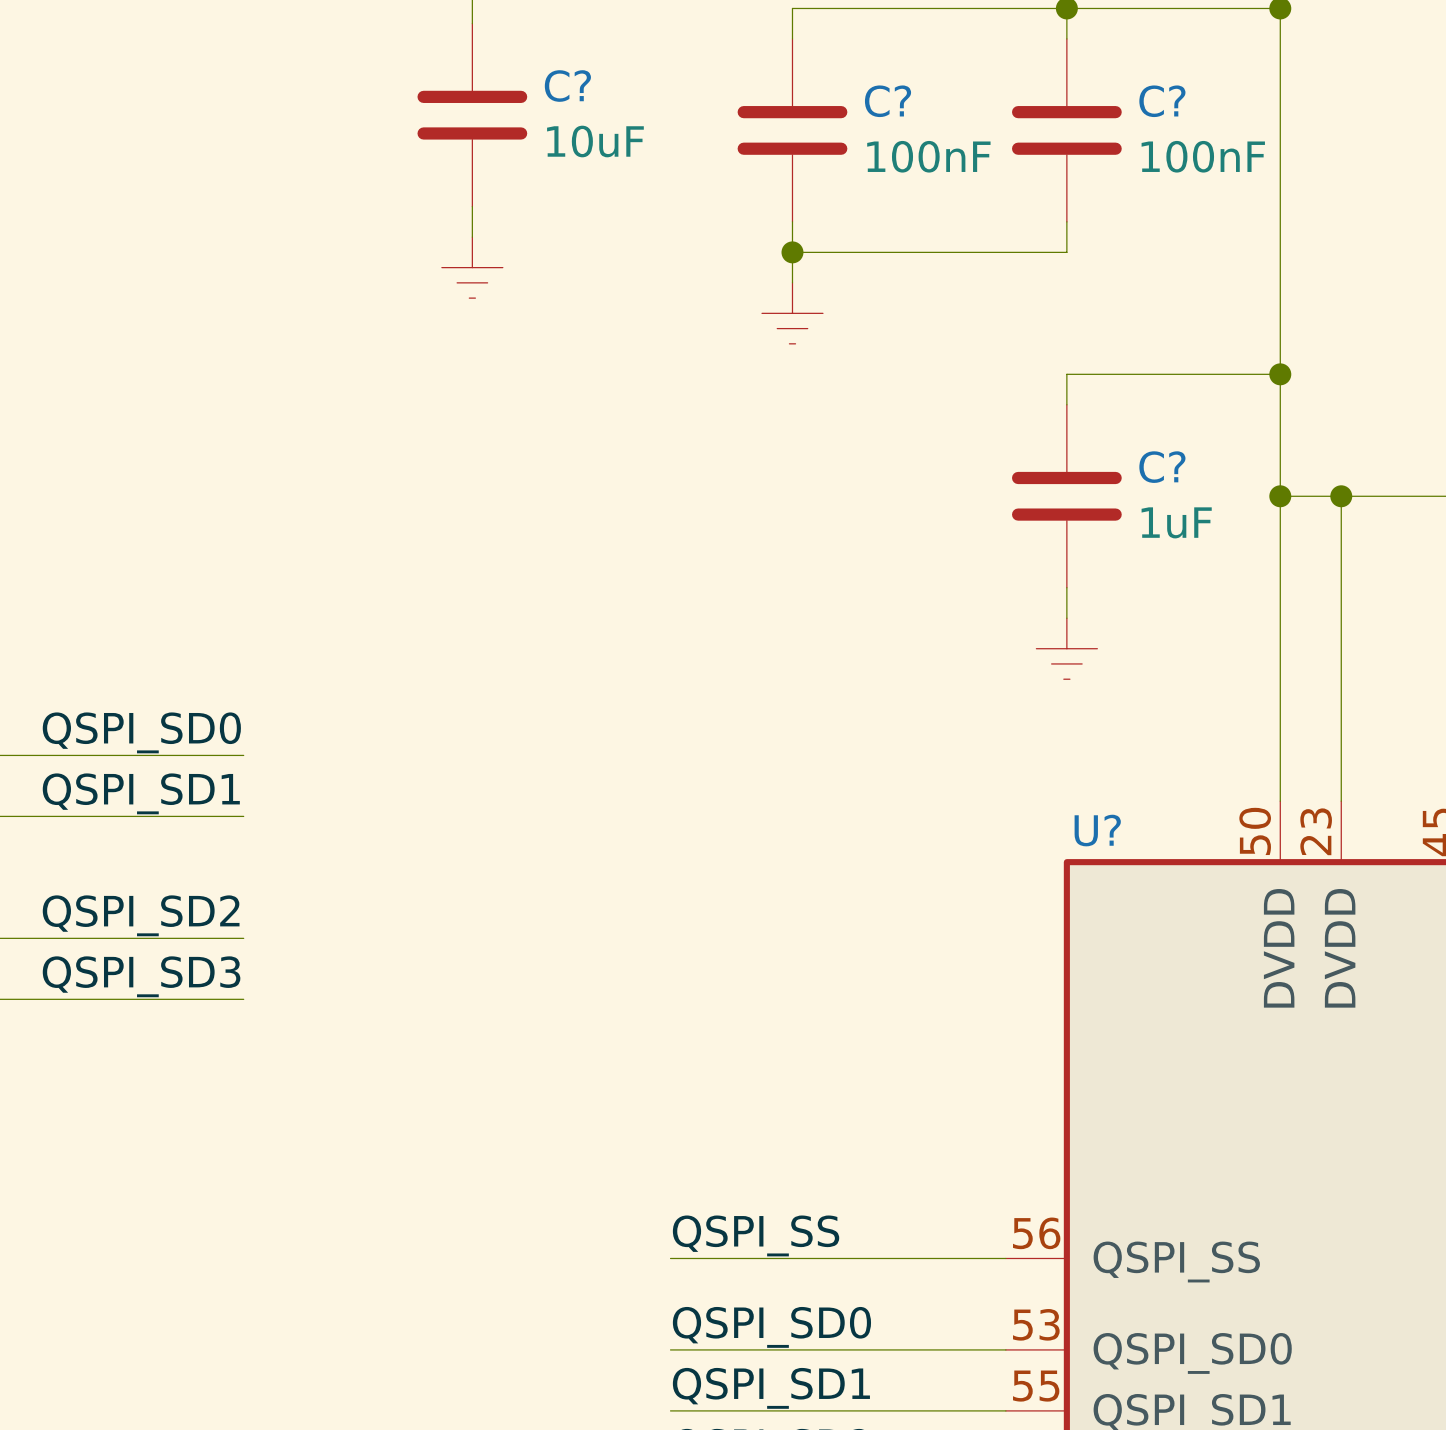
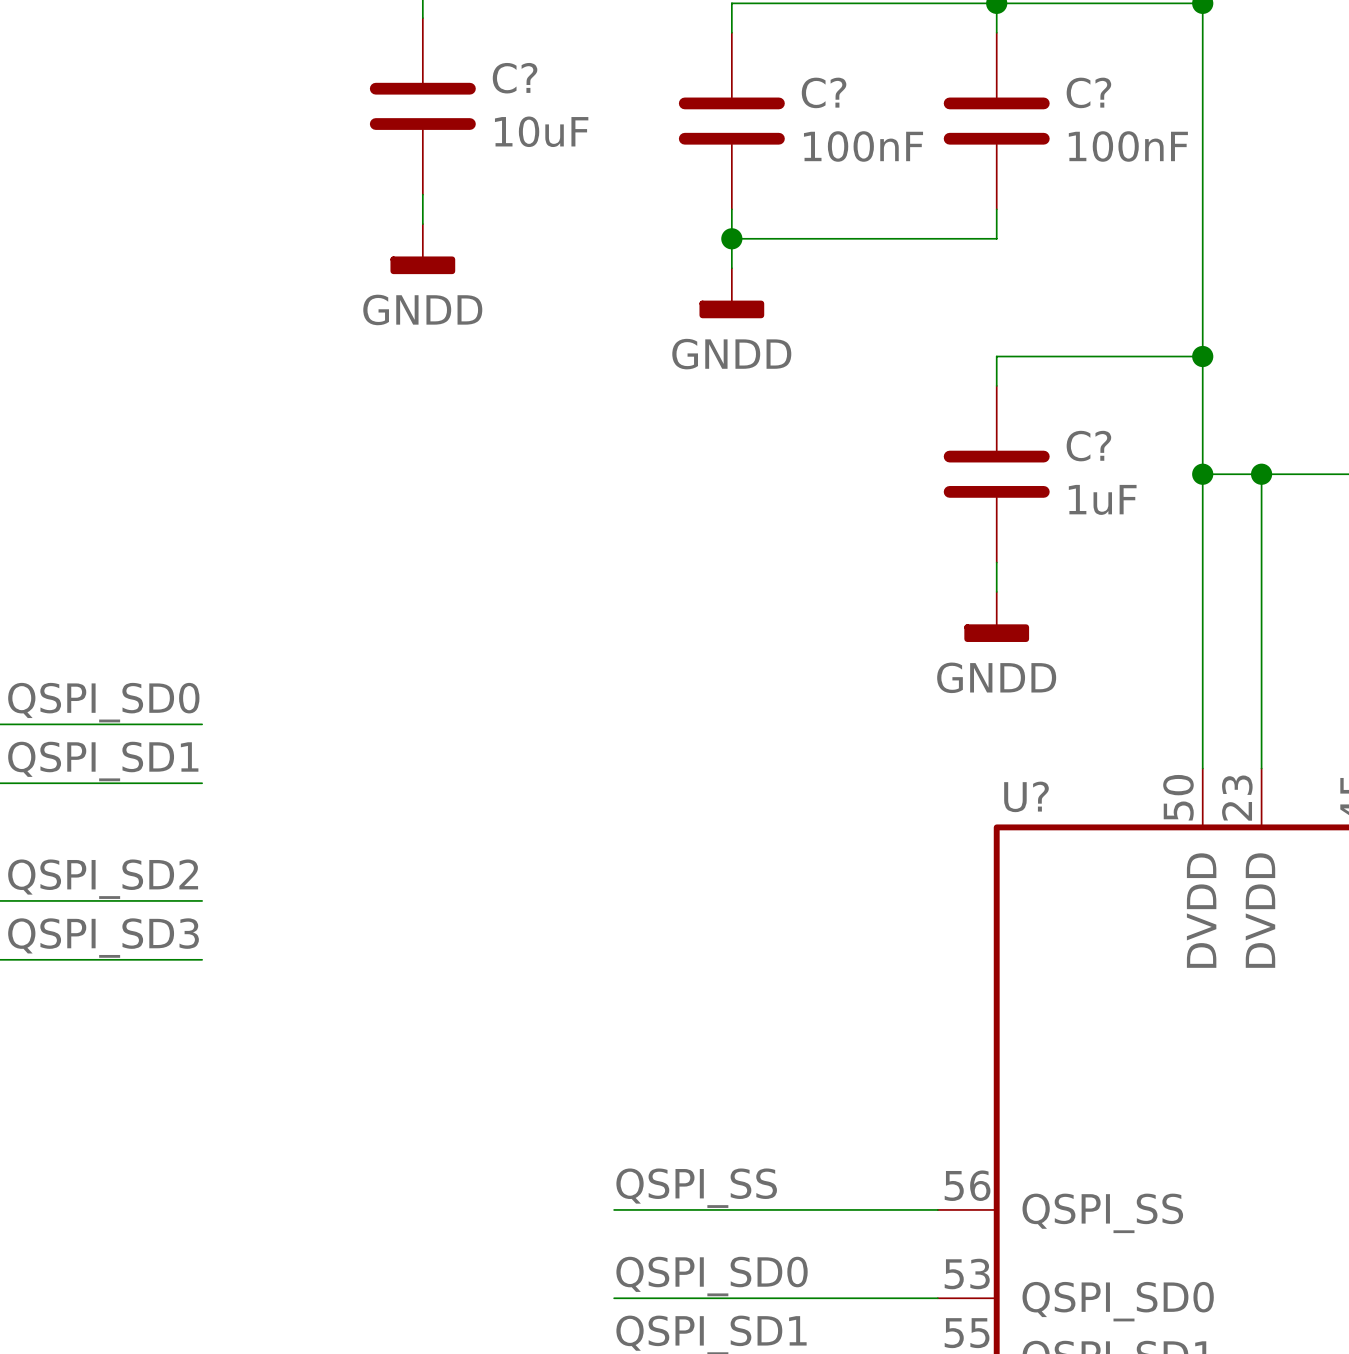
power symbol shape: [441, 237, 503, 299] -> [390, 224, 456, 275]
power symbol shape: [761, 282, 823, 344] -> [699, 268, 765, 319]
power symbol text: none -> GNDD (422, 309)
power symbol text: none -> GNDD (731, 354)
power symbol shape: [1036, 618, 1098, 680] -> [964, 591, 1030, 642]
power symbol text: none -> GNDD (996, 677)

